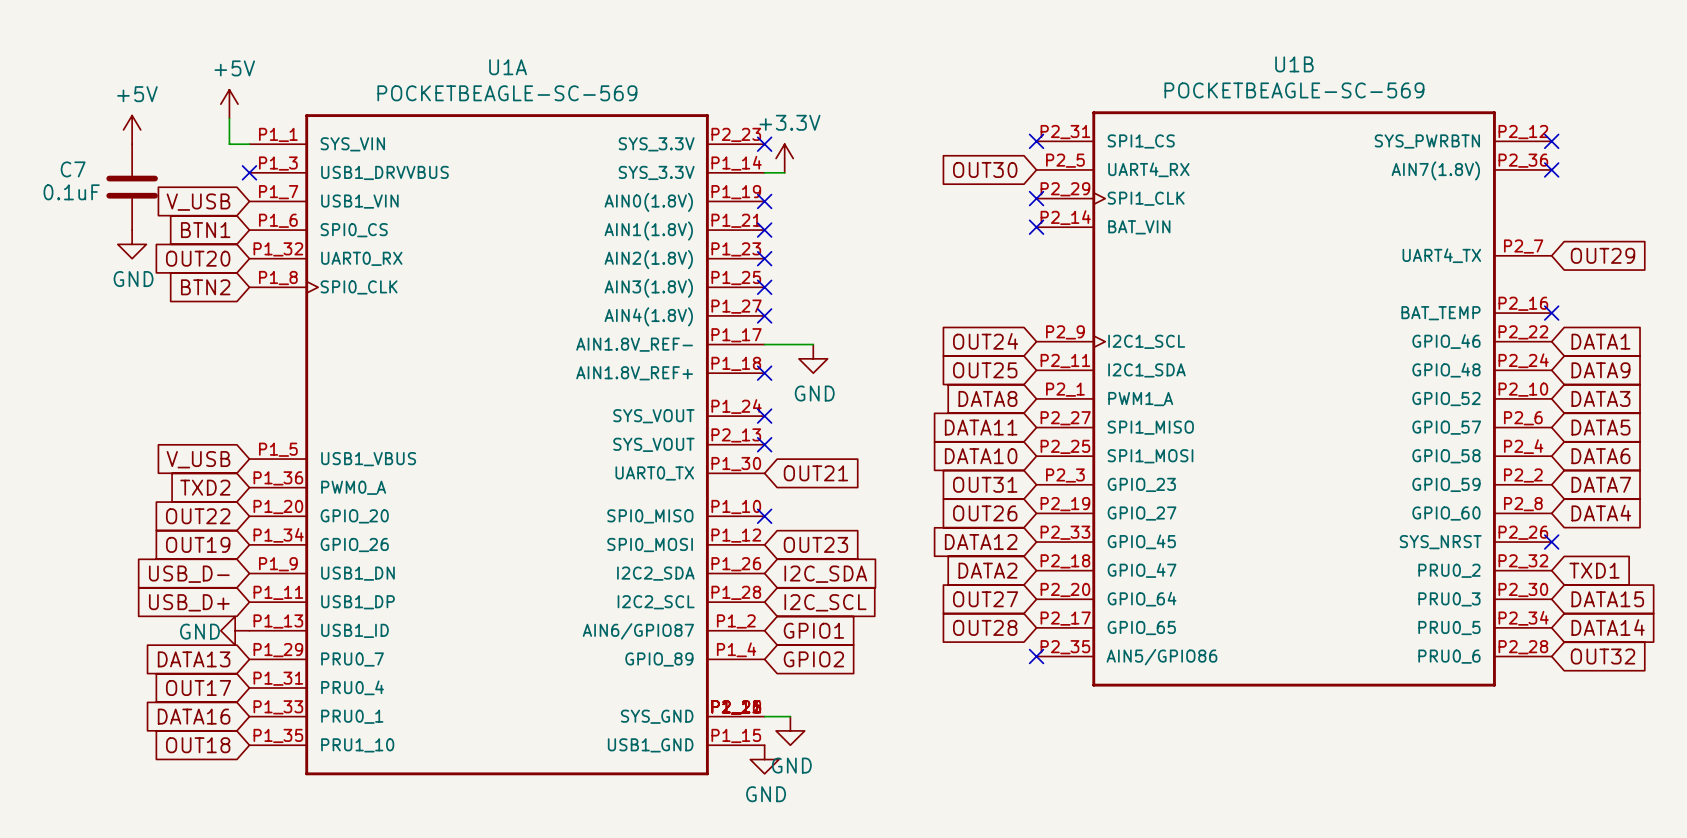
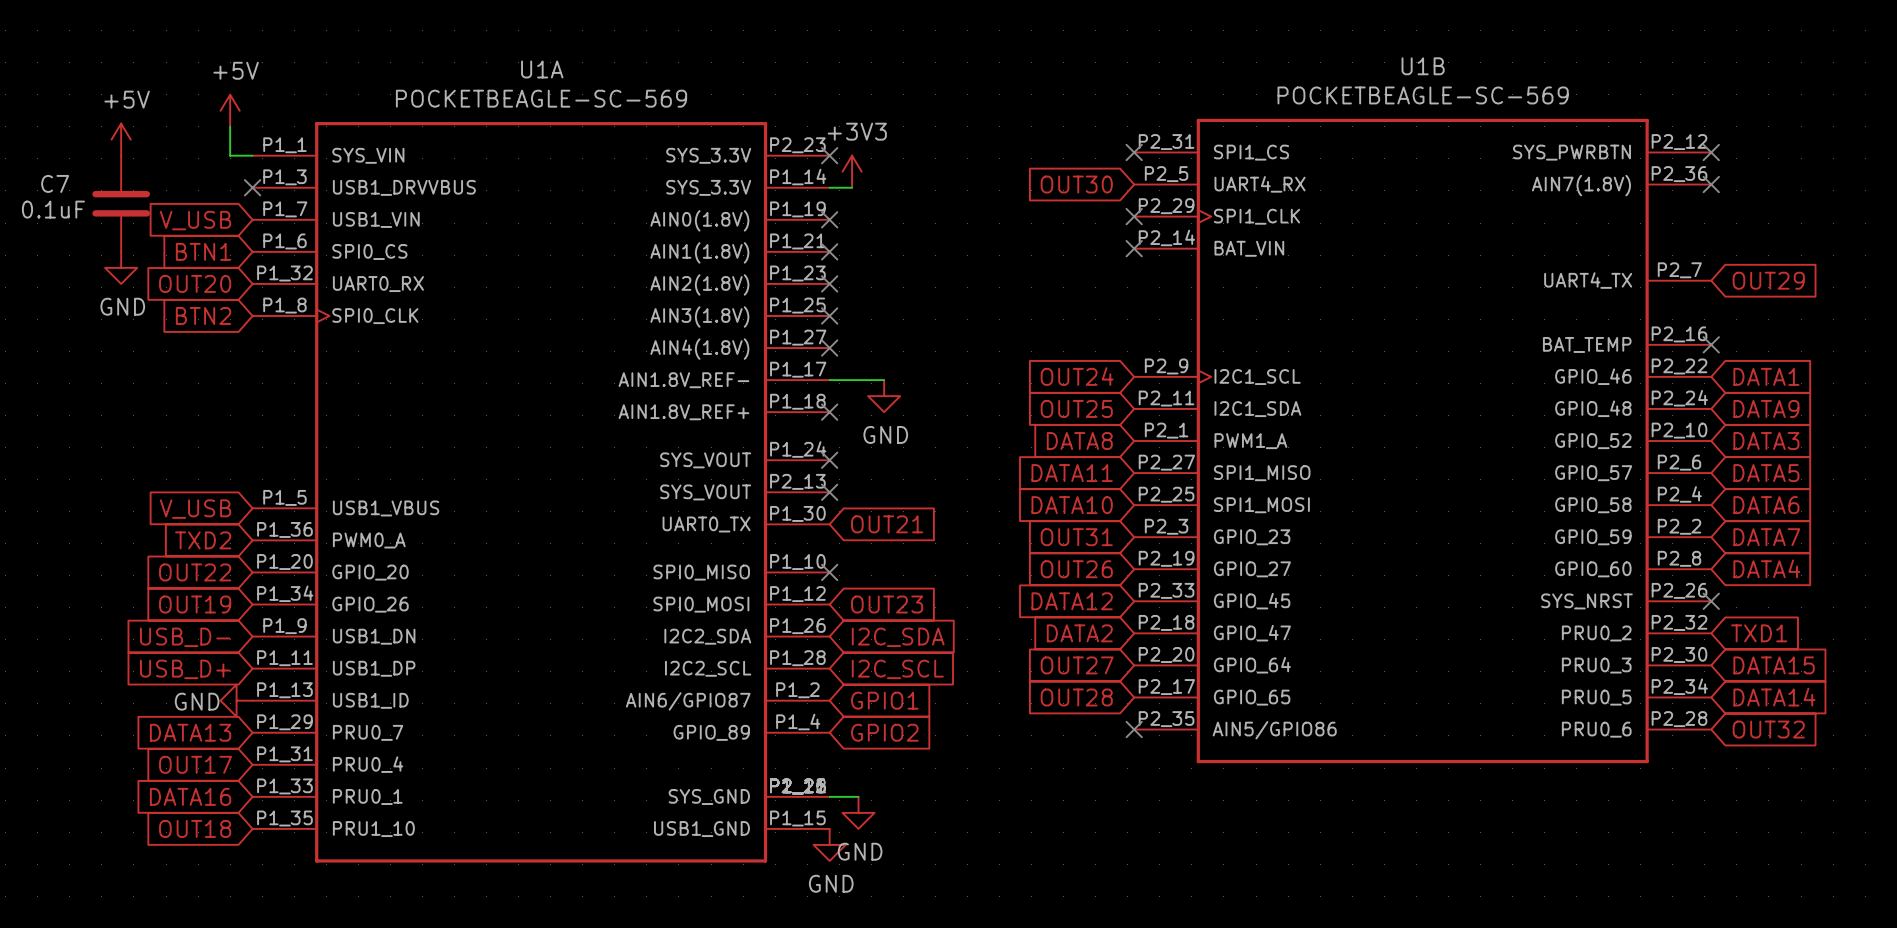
power symbol: +3.3V (784, 158) -> +3V3 (852, 171)

